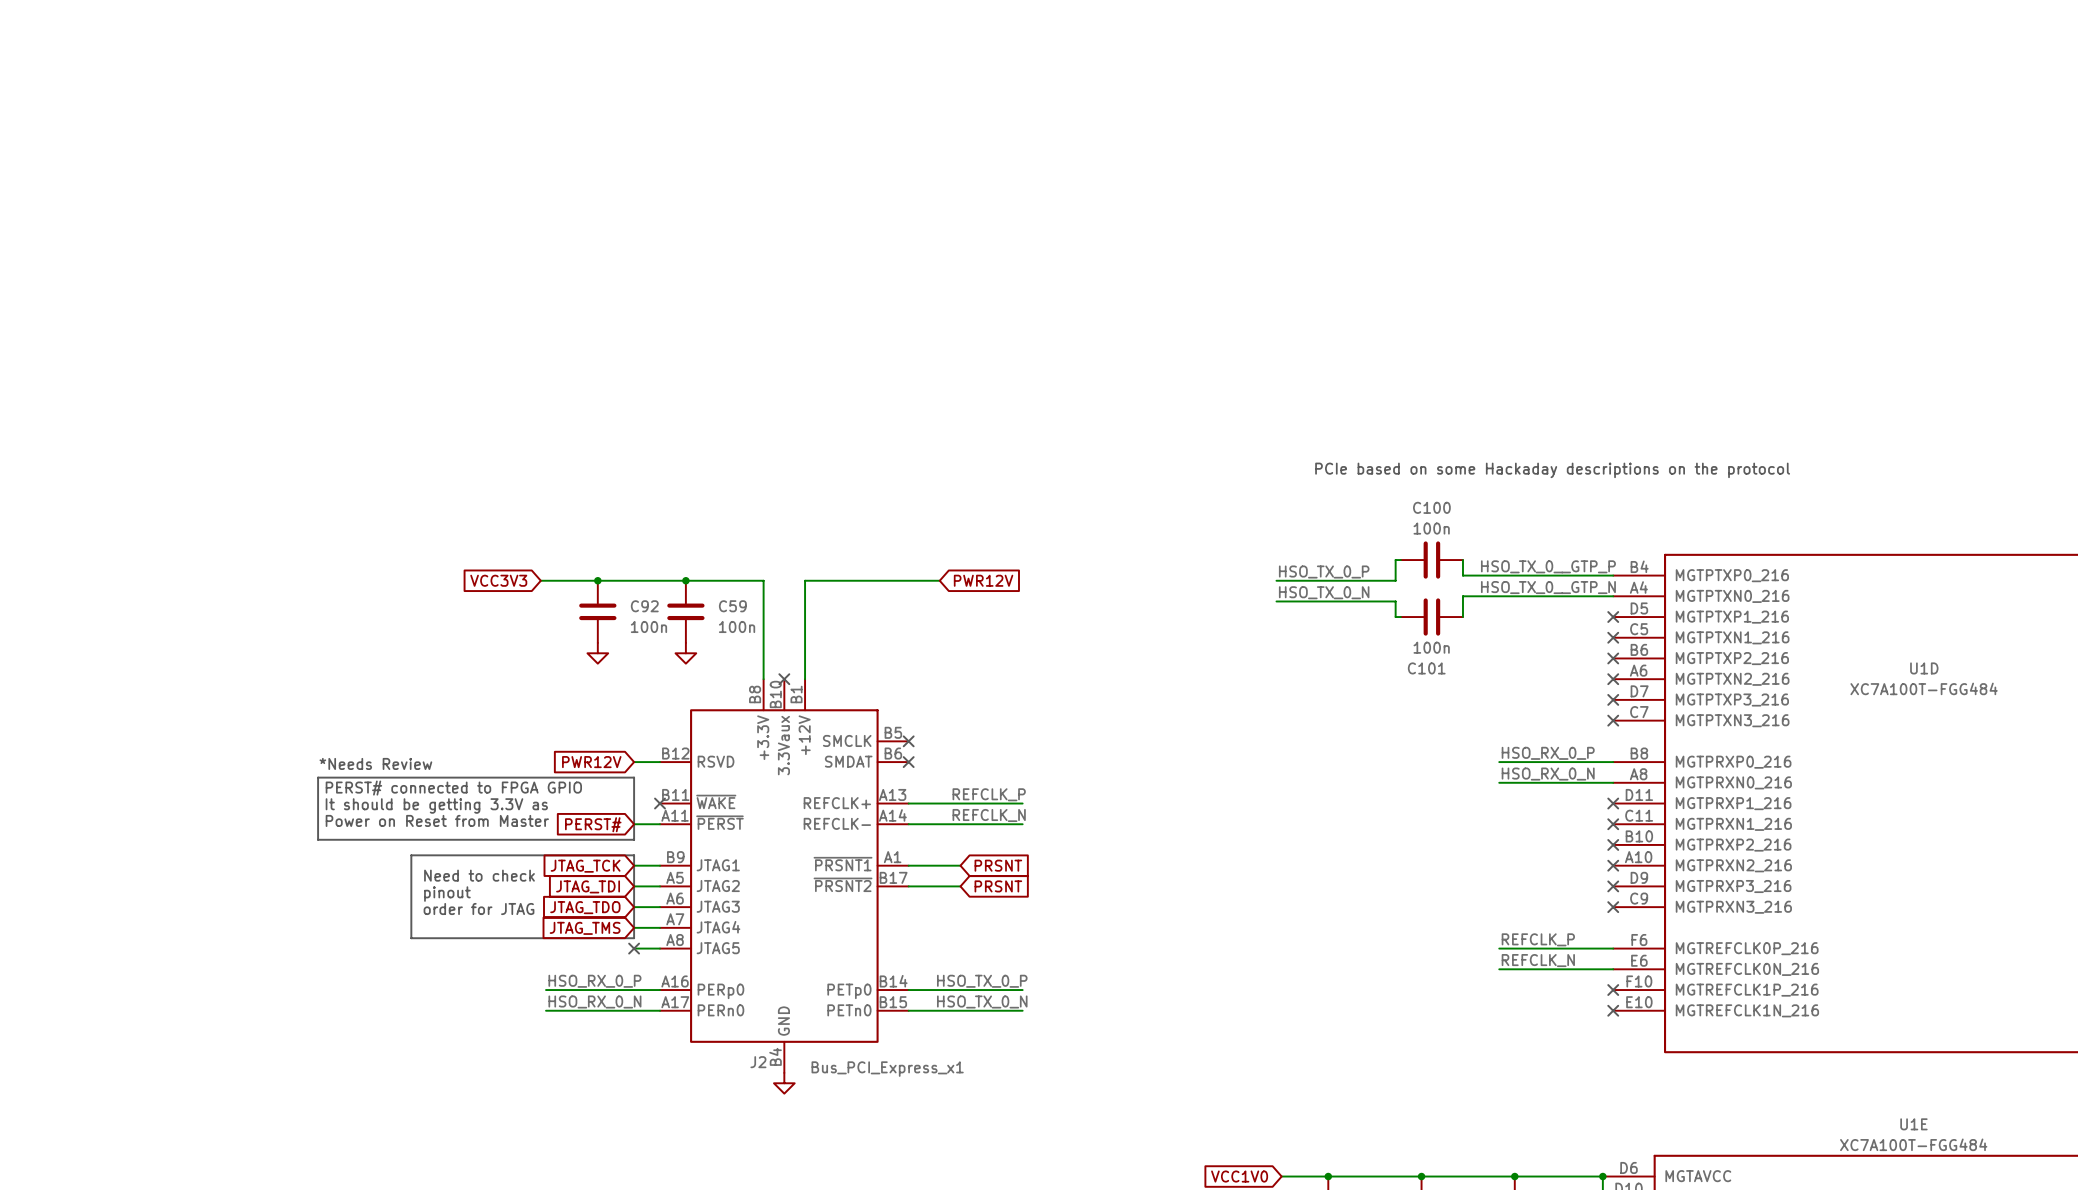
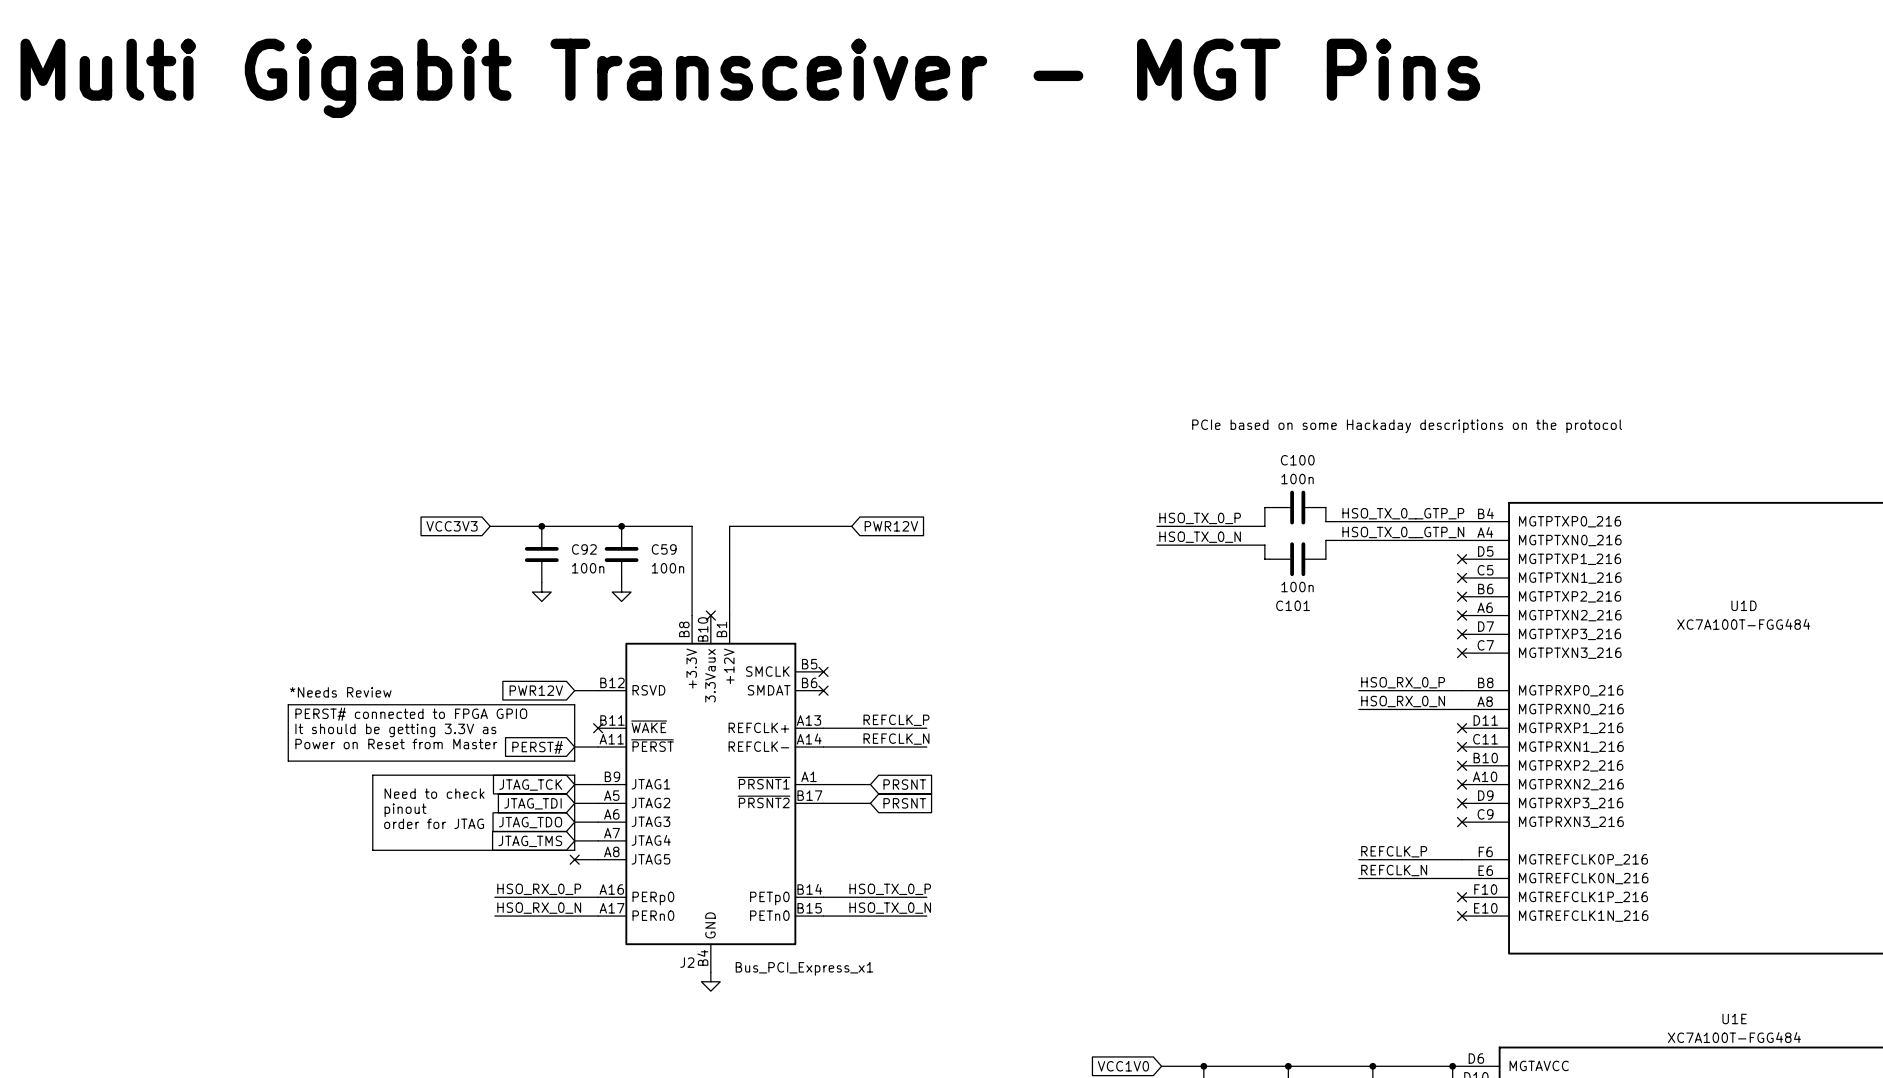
text: none -> Multi Gigabit Transceiver - MGT Pins (750, 78)

